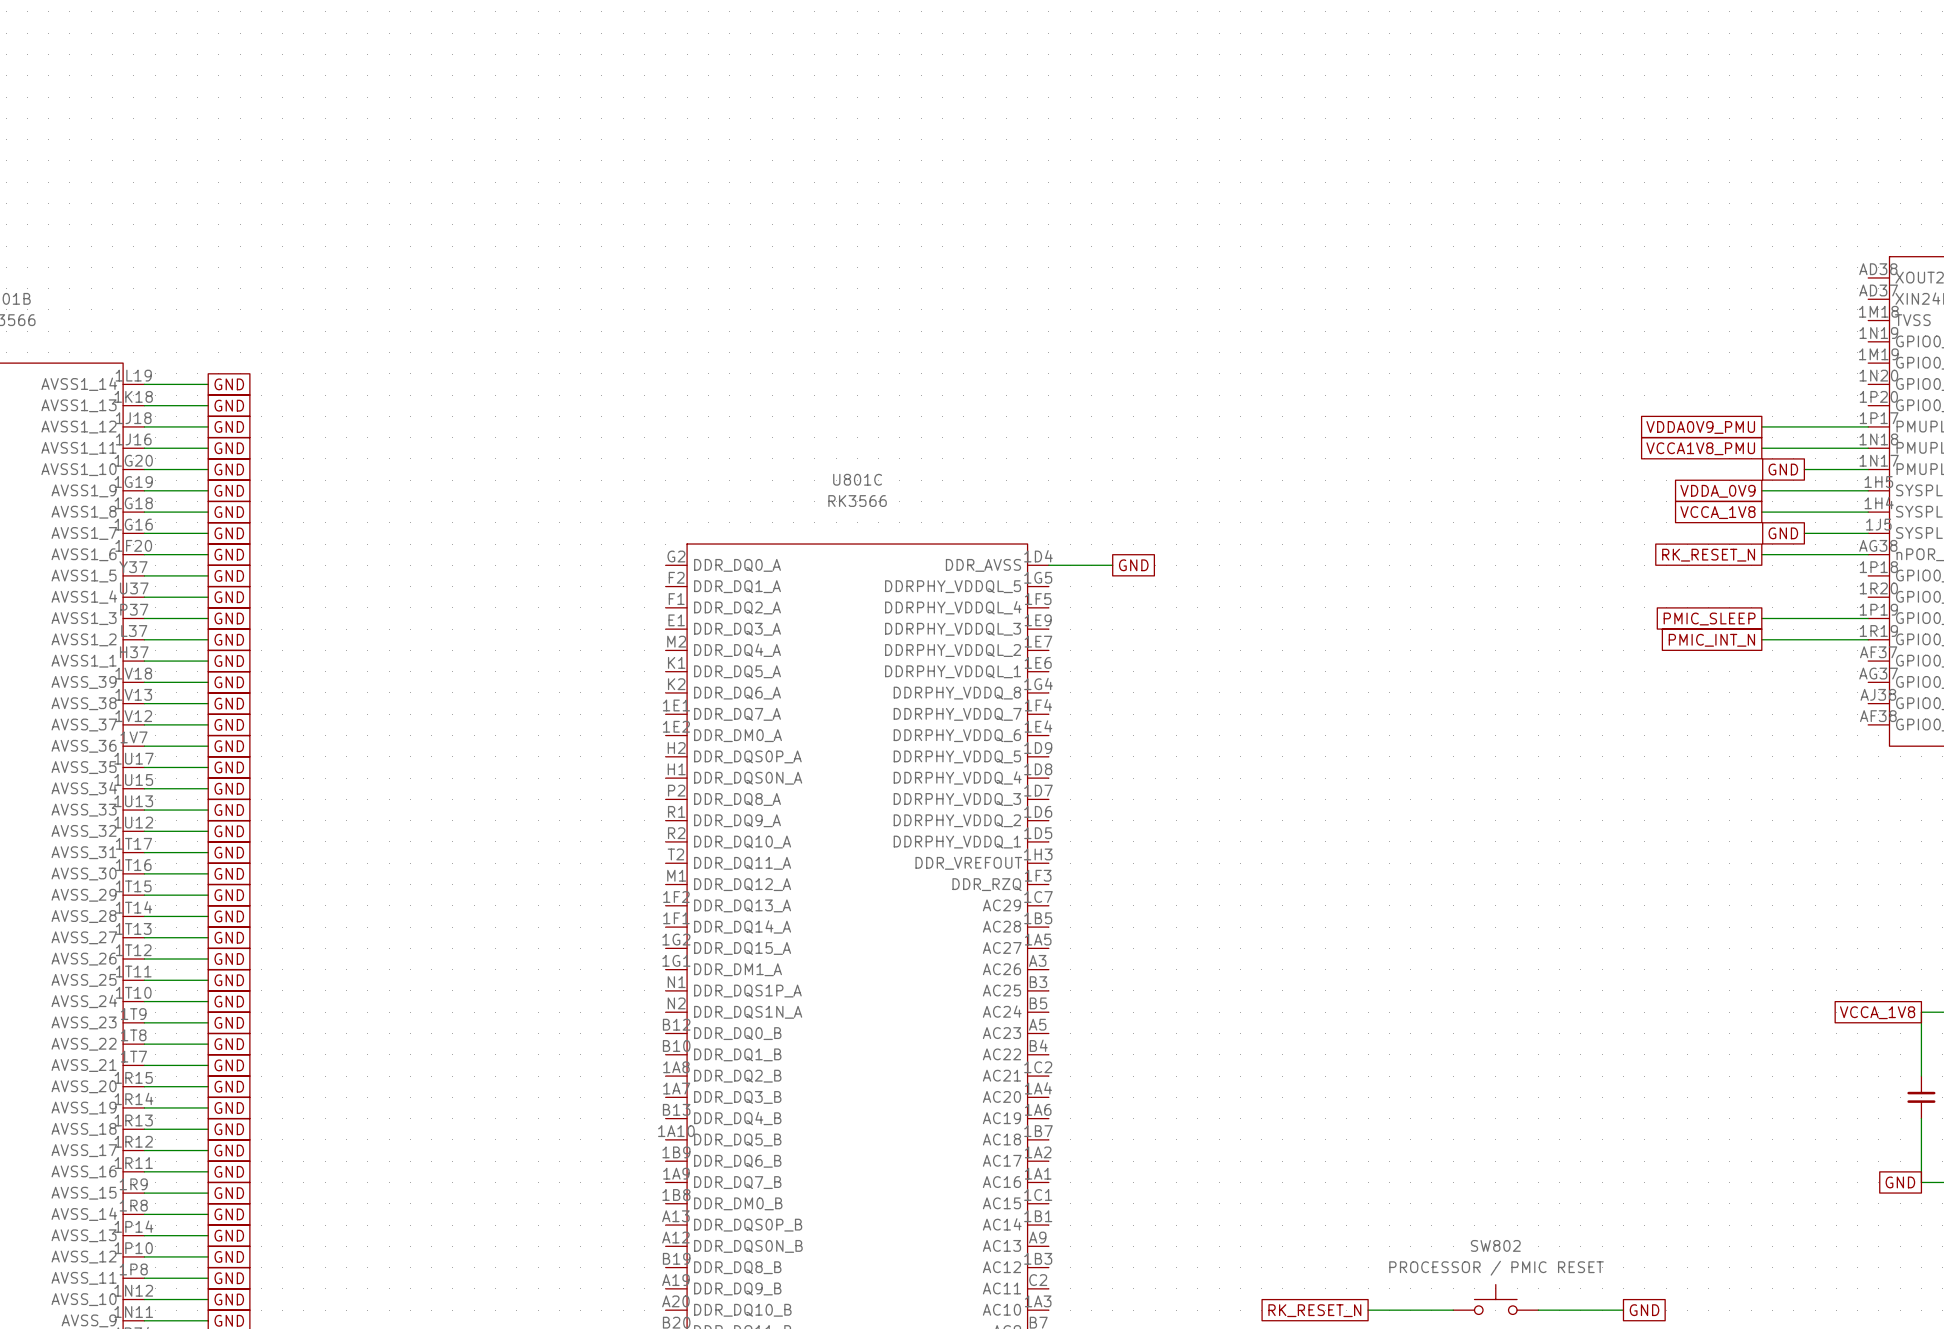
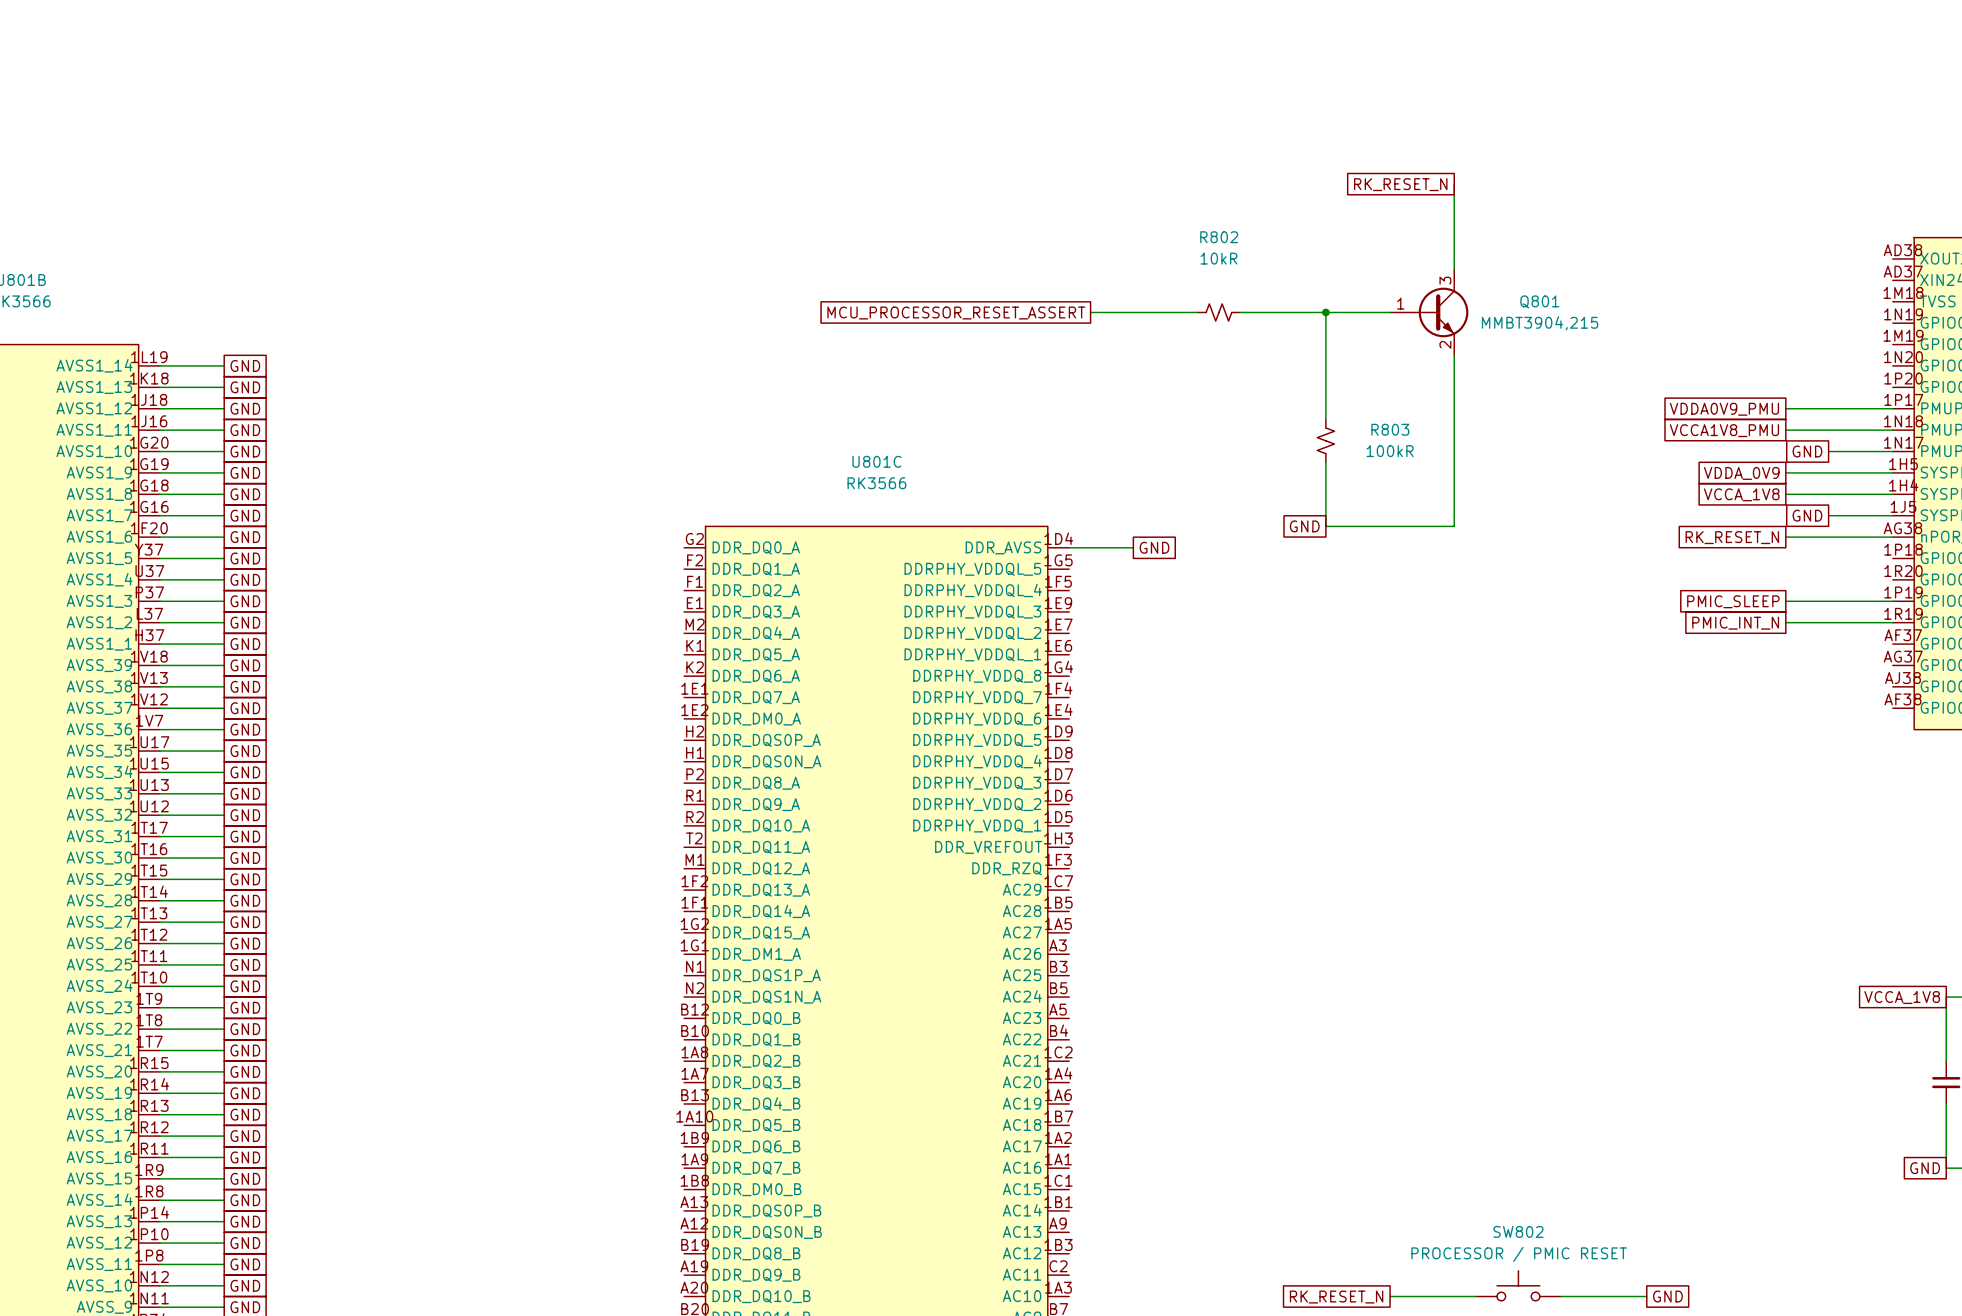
wire: none -> (1454, 184) (1454, 269)
global label: none -> RK_RESET_N (1400, 184)
global label: none -> MCU_PROCESSOR_RESET_ASSERT (956, 312)
wire: none -> (1090, 312) (1197, 312)
R802: none -> 10kR (1218, 312)
wire: none -> (1240, 312) (1390, 312)
wire: none -> (1325, 312) (1325, 419)
junction: none -> (1325, 312)
Q801: none -> MMBT3904,215 (1429, 312)
wire: none -> (1454, 355) (1454, 526) (1325, 526) (1325, 462)
R803: none -> 100kR (1325, 440)
global label: none -> GND (1304, 526)

